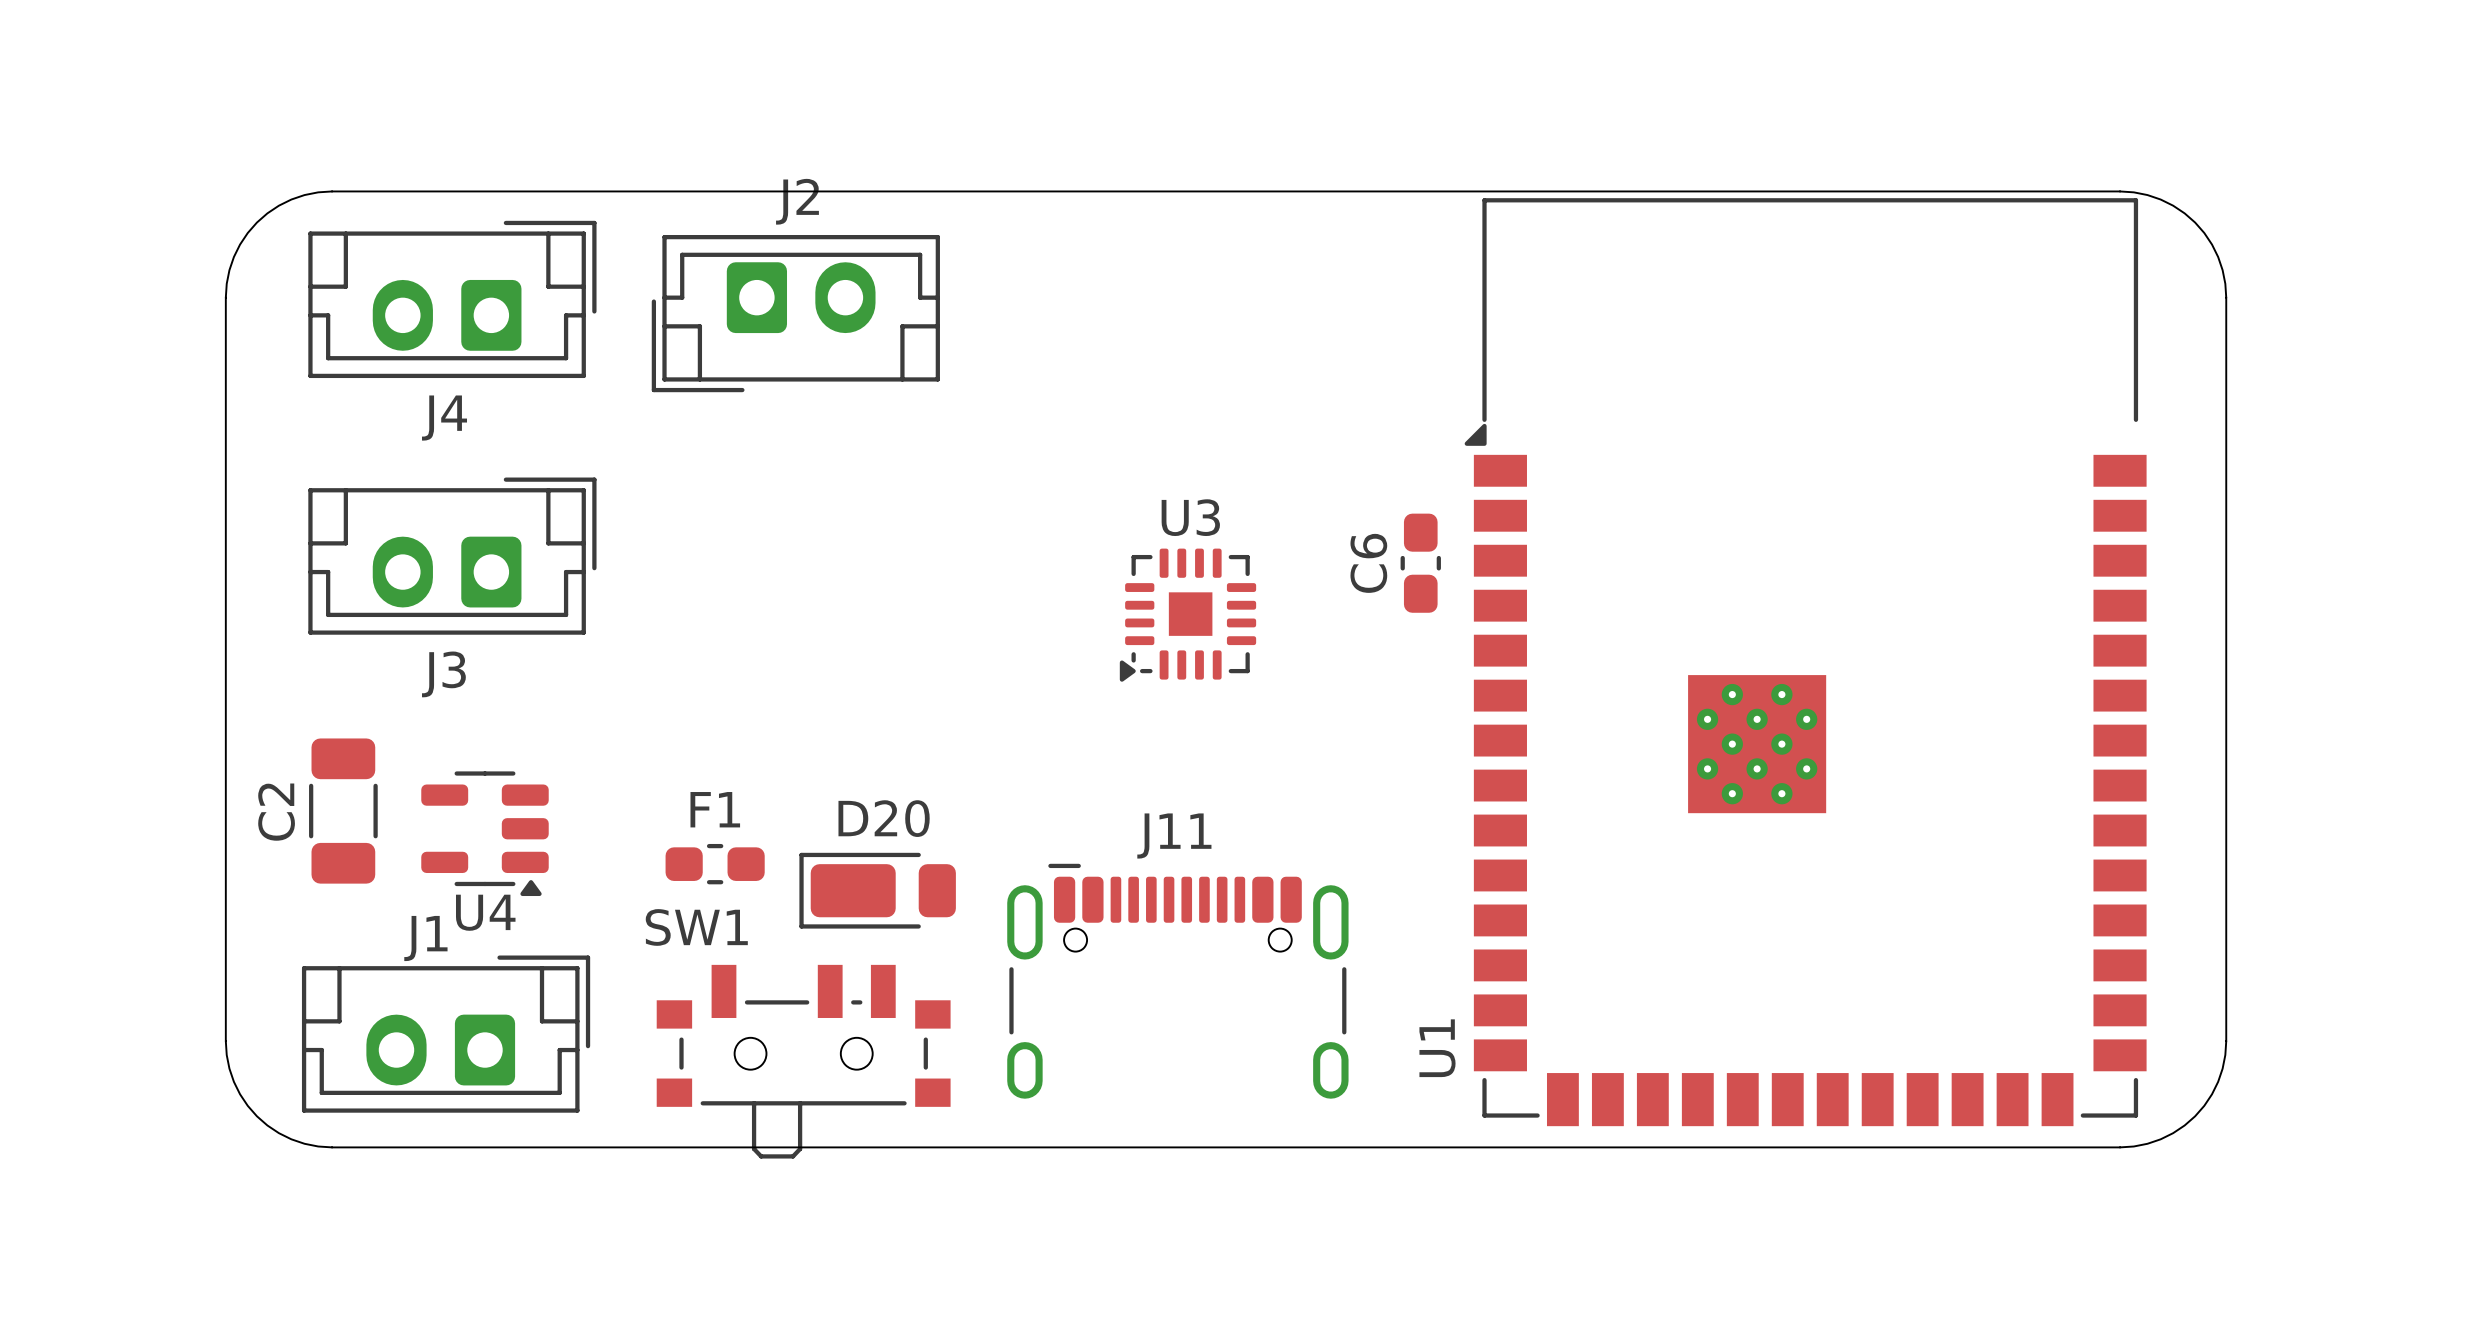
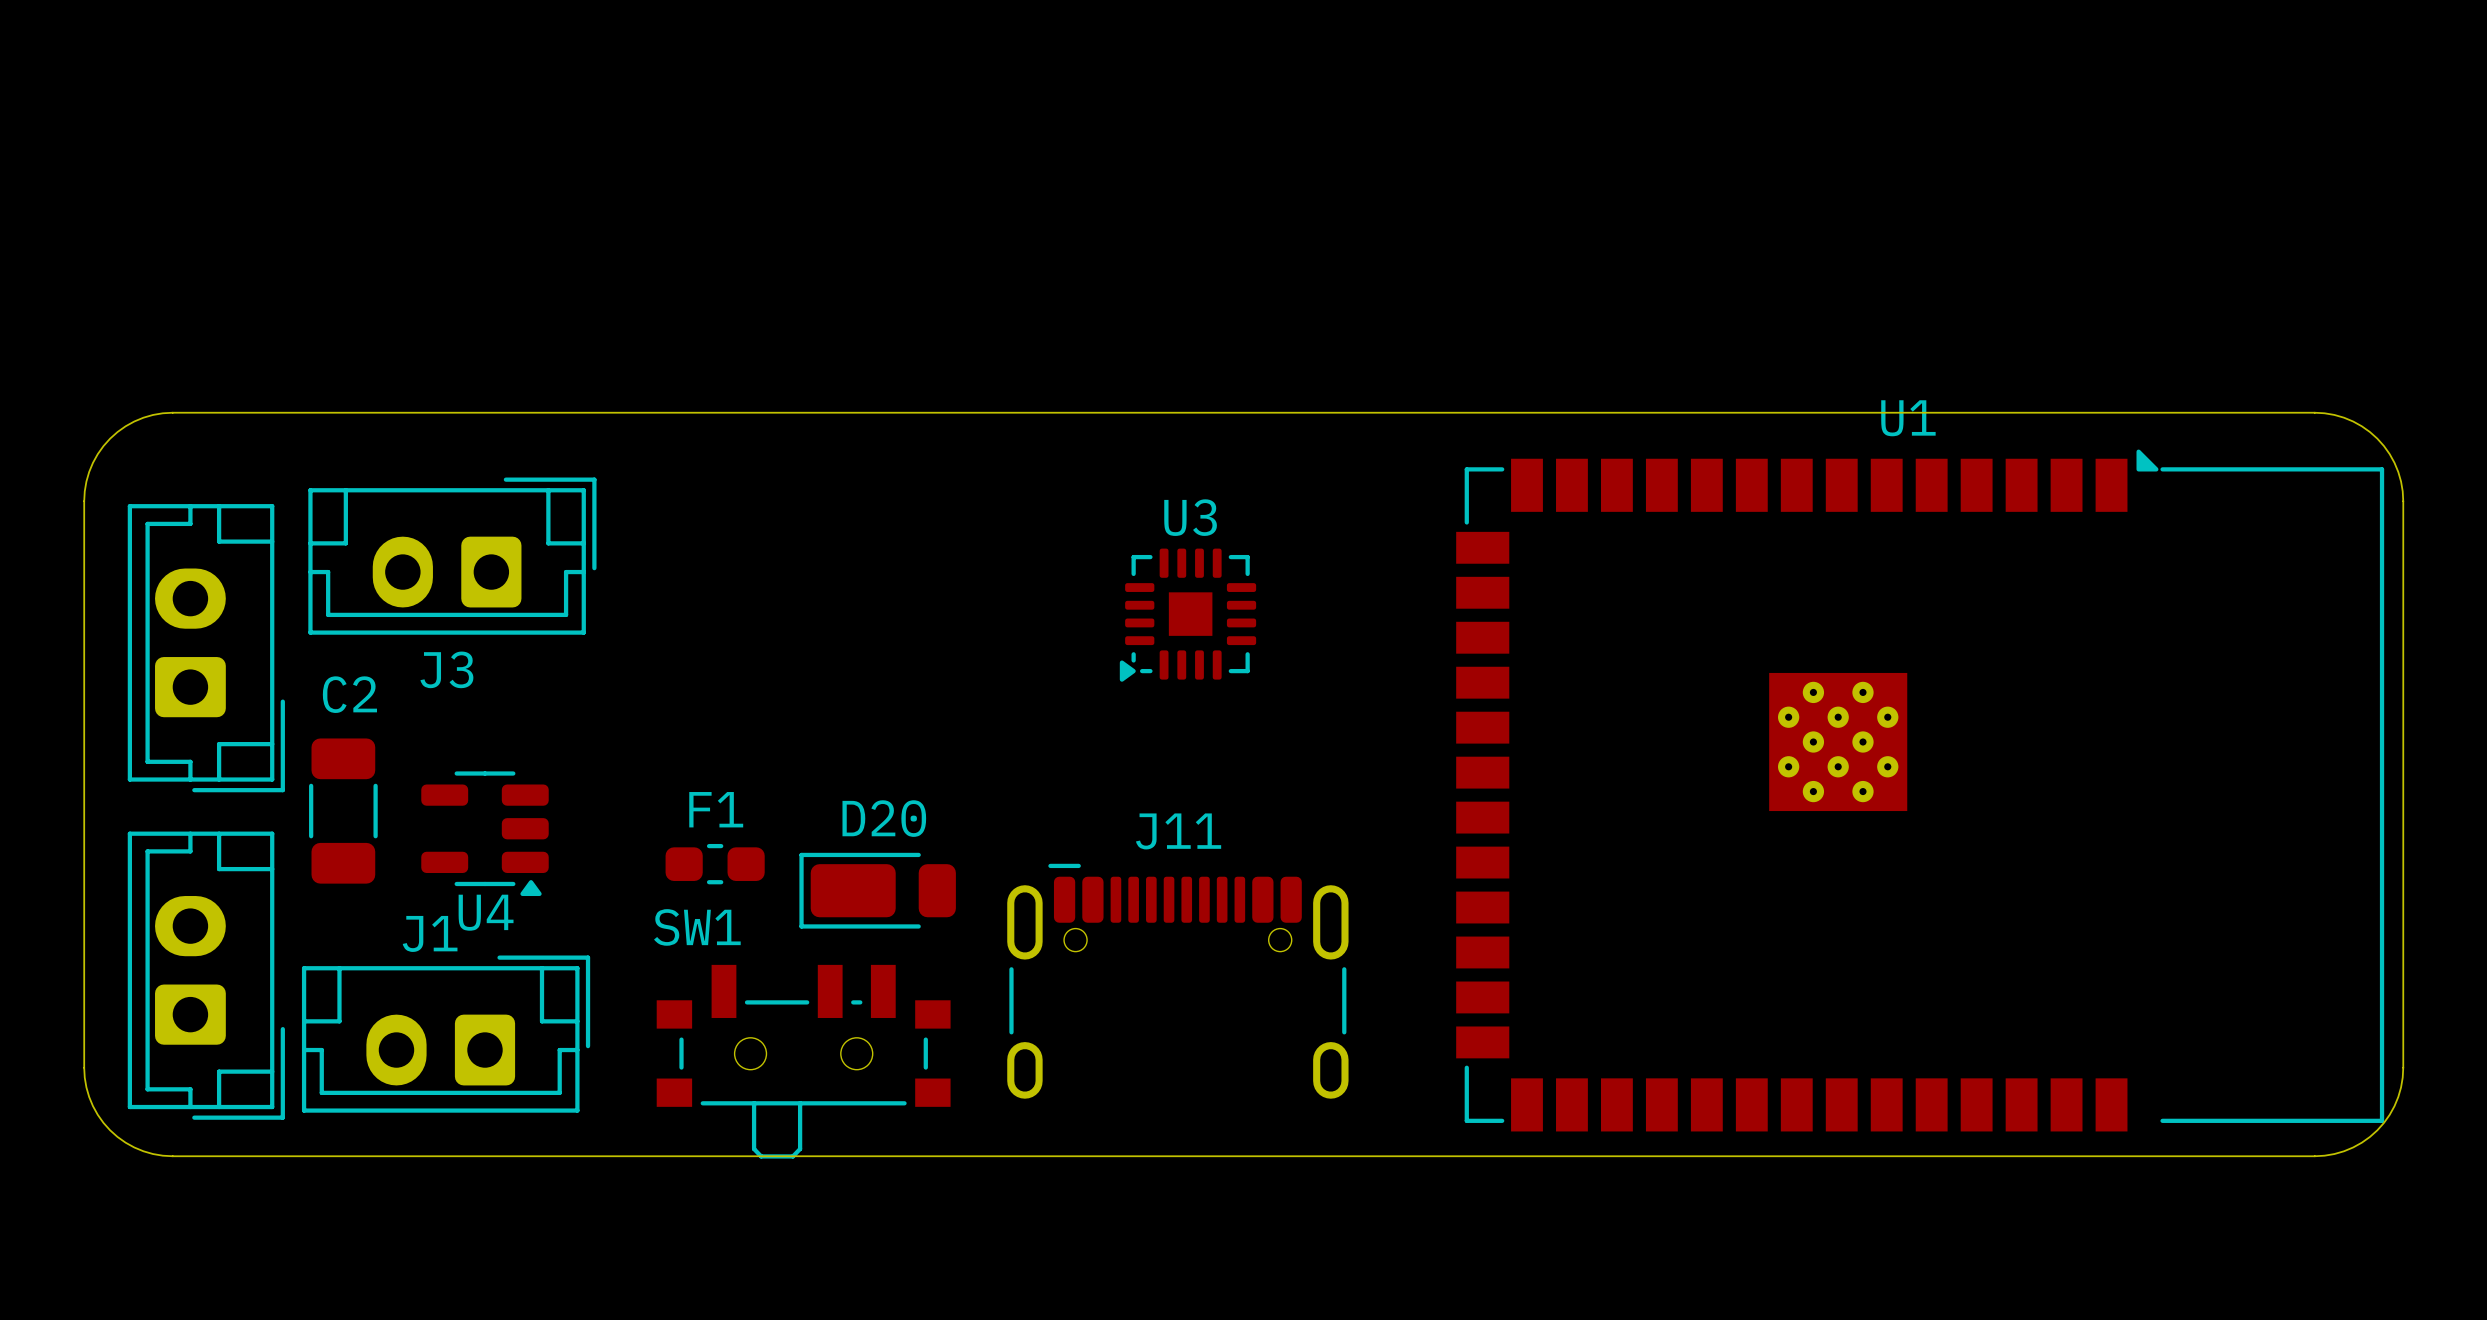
board edge: (332, 191) (2120, 191) (2147, 195) (2160, 199) (2173, 205) (2195, 222) (2212, 244) (2222, 270) (2226, 297) (2226, 1041) (2225, 1055) (2218, 1081) (2204, 1105) (2195, 1116) (2173, 1133) (2147, 1143) (2120, 1147) (332, 1147) (304, 1143) (291, 1139) (267, 1125) (247, 1105) (233, 1081) (226, 1055) (225, 297) (226, 283) (233, 257) (240, 244) (256, 222) (267, 213) (291, 199) (304, 195) (332, 191) -> (172, 412) (153, 414) (134, 421) (110, 438) (97, 454) (89, 472) (84, 501) (84, 1077) (89, 1096) (103, 1122) (125, 1142) (143, 1151) (172, 1156) (2314, 1156) (2334, 1154) (2361, 1142) (2383, 1122) (2398, 1096) (2403, 1067) (2402, 491) (2394, 462) (2383, 446) (2361, 426) (2343, 417) (2314, 412) (172, 412)
J4: (452, 299) -> none
J2: (795, 313) -> none
C6: (1420, 563) -> none
part: none -> (206, 648)
U1 rotation: 0° (1805, 662) -> 90° clockwise (1920, 790)
C2 name rotation: 0° (276, 812) -> 90° clockwise (349, 694)
C2 name position: C2 (276, 812) -> C2 (349, 694)
part: none -> (206, 975)
U1 name position: U1 (1437, 1048) -> U1 (1908, 418)

